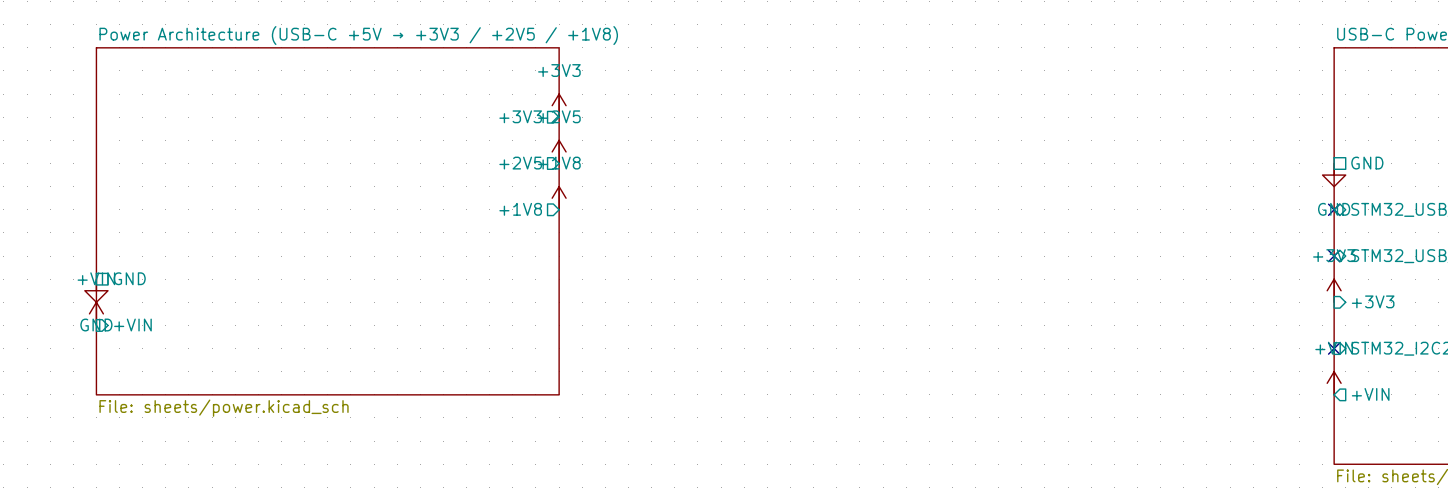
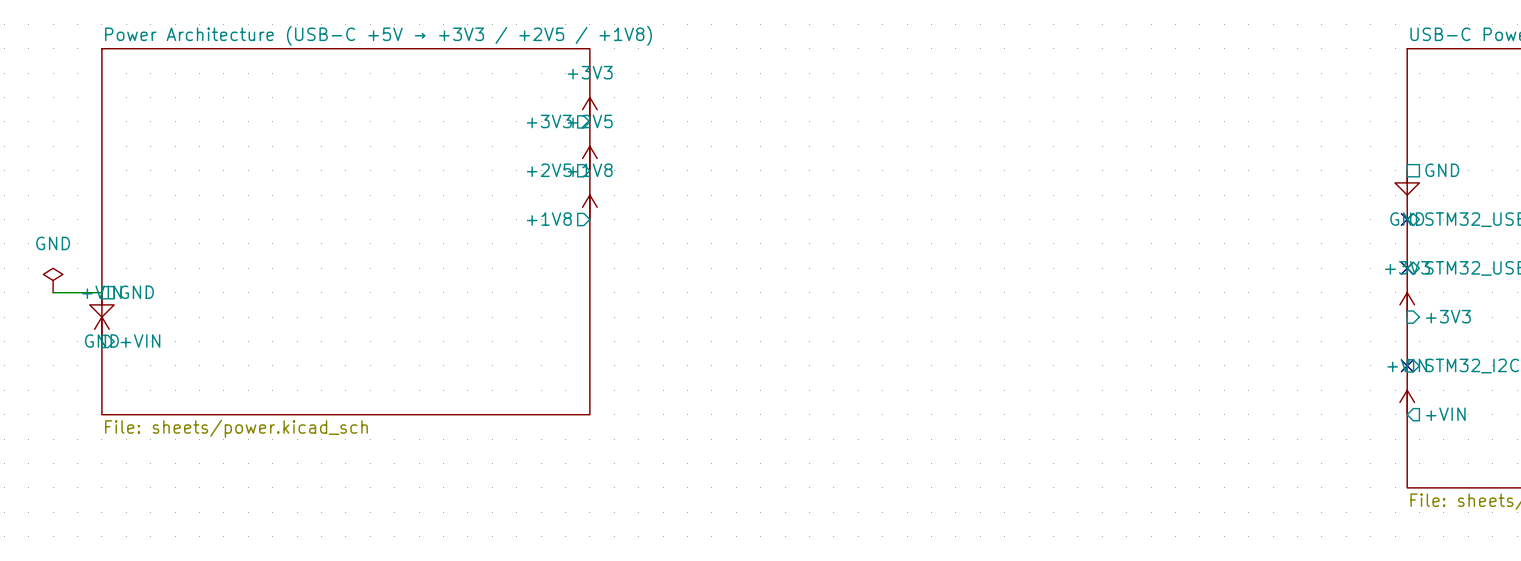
power symbol: none -> GND (53, 280)
wire: none -> (53, 292) (101, 292)

